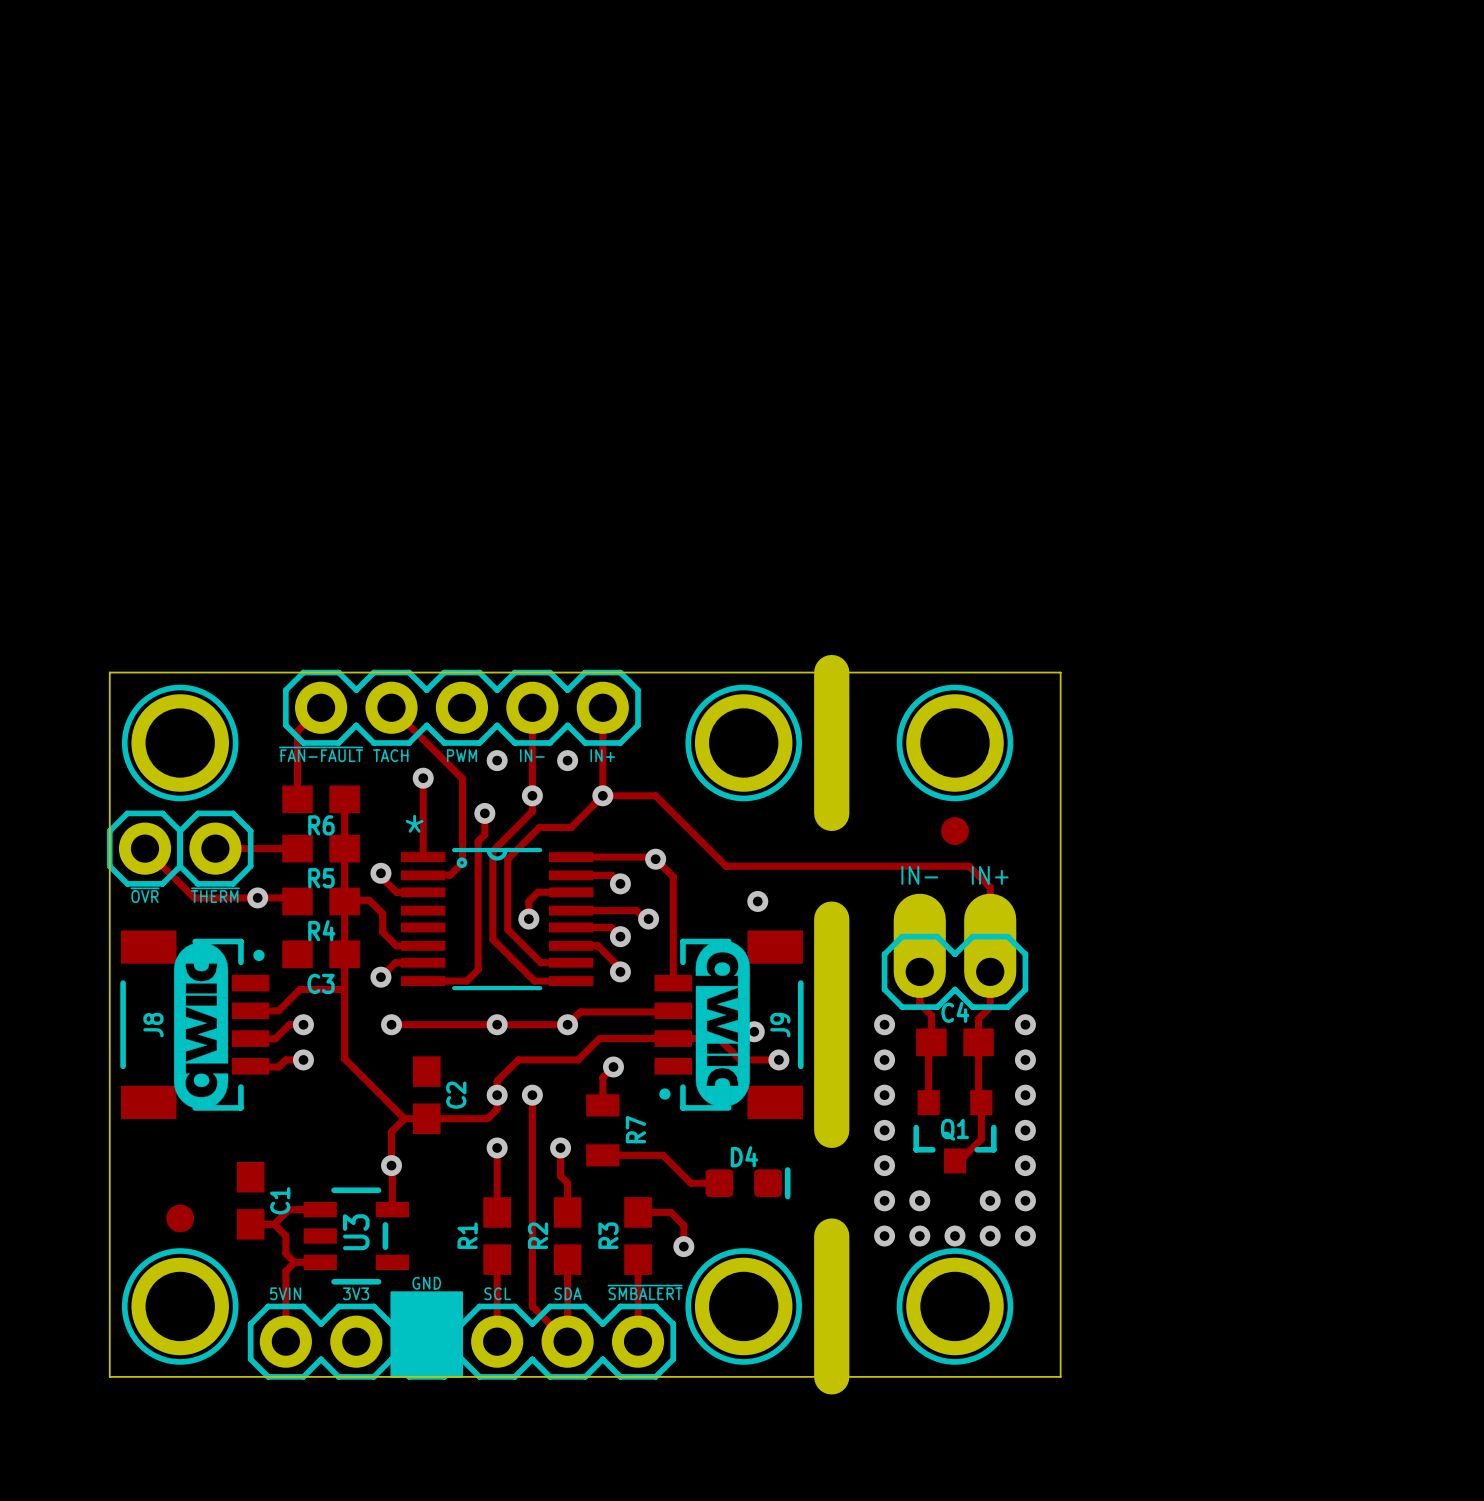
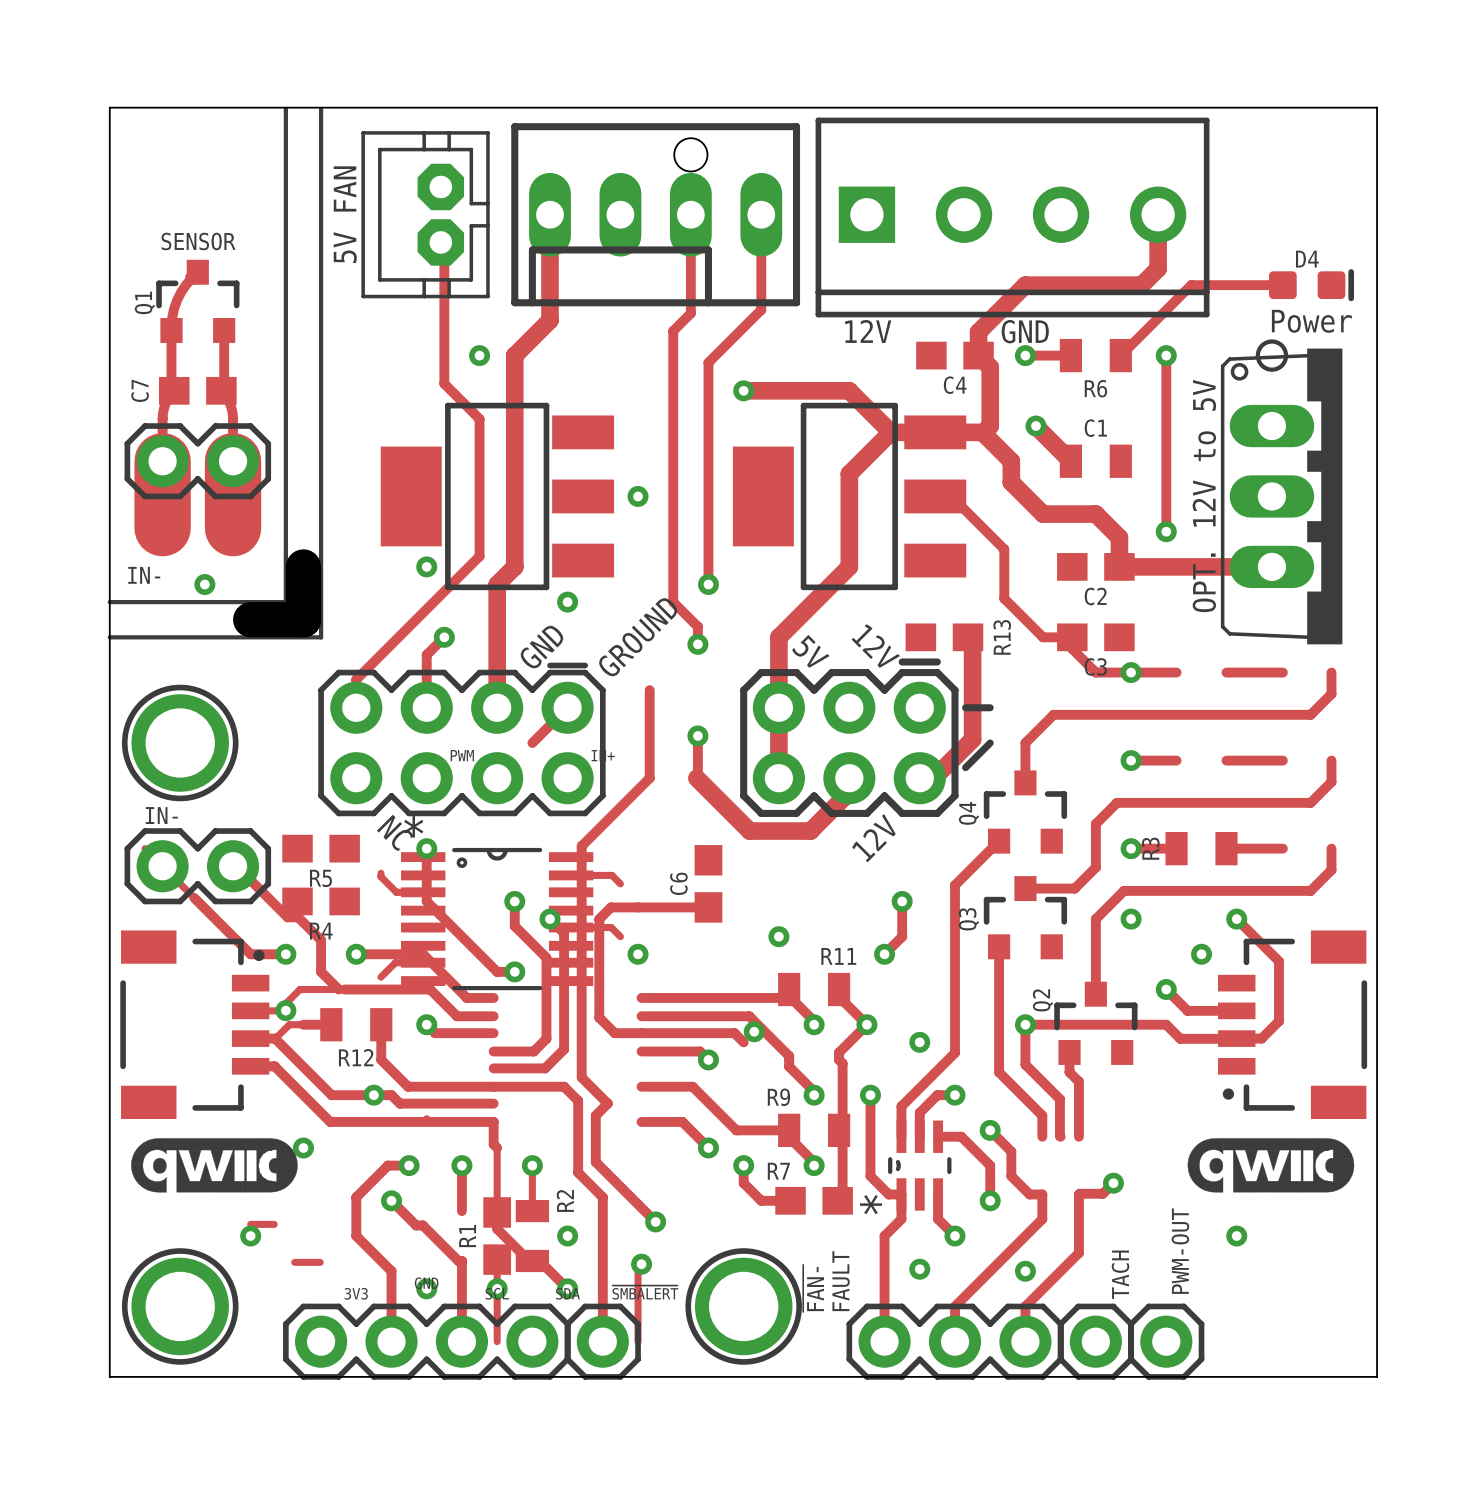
line: none -> (285, 109) (285, 602) (109, 602)
line: none -> (321, 109) (321, 637) (109, 637)
part: none -> (425, 214)
track: none -> (549, 214) (549, 320) (514, 355) (514, 566) (497, 584) (497, 707)
part: none -> (655, 214)
track: none -> (690, 214) (690, 313) (673, 330) (673, 602) (697, 626) (697, 644)
track: none -> (761, 214) (761, 309) (708, 362) (708, 584)
track: none -> (1158, 214) (1158, 268) (1141, 285) (1025, 285) (978, 332) (978, 355) (990, 367) (990, 426) (983, 433)
text: none -> 5V FAN (345, 214)
part: none -> (1012, 217)
text: none -> SENSOR (198, 241)
track: none -> (440, 242) (444, 245) (444, 383) (479, 418) (479, 556) (356, 679) (356, 707)
track: none -> (197, 272) (180, 292) (172, 318) (171, 384) (174, 390) (167, 399) (162, 413) (162, 528)
track: none -> (1282, 285) (1191, 285) (1120, 355)
text: none -> Power (1311, 321)
track: none -> (224, 330) (224, 384) (221, 390) (227, 399) (232, 413) (233, 528)
text: none -> 12V (868, 331)
text: none -> GND (1025, 331)
drawing: none -> [1255, 339, 1289, 372]
via: none -> (479, 355)
track: none -> (1025, 355) (1070, 355)
via: none -> (1025, 355)
track: none -> (1166, 355) (1166, 531)
via: none -> (1166, 355)
C7: none -> (197, 390)
track: none -> (743, 390) (849, 390) (890, 432)
via: none -> (743, 390)
track: none -> (1035, 426) (1070, 461)
via: none -> (1035, 426)
track: none -> (890, 432) (982, 432) (1011, 461) (1011, 482) (1043, 514) (1095, 514) (1119, 537) (1119, 566) (1271, 566)
track: none -> (890, 432) (849, 473) (849, 566) (778, 637) (778, 778)
part: none -> (197, 461)
text: none -> OPT. 12V to 5V (1204, 496)
part: none -> (497, 496)
via: none -> (638, 496)
part: none -> (849, 496)
track: none -> (935, 496) (951, 496) (1004, 549) (1004, 598) (1043, 637) (1072, 637) (1072, 648) (1095, 672) (1176, 672)
part: none -> (1281, 496)
via: none -> (1166, 531)
board edge: none -> (303, 566) (303, 619) (250, 619)
via: none -> (426, 566)
text: none -> IN- (144, 575)
via: none -> (204, 584)
via: none -> (708, 584)
via: none -> (567, 602)
text: none -> GROUND (638, 637)
track: none -> (444, 637) (426, 654) (426, 707)
via: none -> (444, 637)
R13: none -> (944, 637)
track: none -> (968, 637) (972, 641) (972, 739) (933, 778) (919, 778)
text: none -> GND (541, 647)
via: none -> (697, 644)
text: none -> 12V (875, 646)
text: none -> 5V (810, 651)
line: none -> (902, 661) (937, 661)
board edge: (109, 672) (1060, 672) (1060, 1376) -> (109, 672) (109, 107) (1377, 107) (1377, 1376) (1060, 1376)
line: none -> (761, 672) (743, 690) (743, 795) (761, 813) (796, 813) (814, 795) (831, 813) (866, 813) (884, 795) (902, 813) (937, 813) (954, 795) (954, 690) (937, 672) (902, 672) (884, 690) (866, 672) (831, 672) (814, 690) (796, 672) (761, 672)
board edge: (831, 672) (831, 813) -> none
via: none -> (1131, 672)
track: none -> (1226, 672) (1282, 672)
track: none -> (1331, 672) (1331, 694) (1310, 714) (1053, 714) (1025, 742) (1025, 782)
track: none -> (649, 690) (649, 778) (581, 846) (581, 1077) (607, 1103) (595, 1115) (595, 1162) (655, 1221)
track: (321, 707) (297, 731) (297, 799) -> none
track: (391, 707) (462, 778) (462, 862) (450, 875) (423, 875) -> none
part: (461, 707) -> none
track: (532, 707) (532, 811) (492, 851) (492, 939) (534, 981) (571, 981) -> none
track: none -> (567, 707) (532, 742)
track: (602, 707) (602, 795) -> none
line: none -> (965, 707) (990, 707)
track: none -> (697, 735) (696, 778) (749, 831) (810, 831) (849, 792) (849, 778)
via: none -> (697, 735)
part: none -> (461, 739)
part: (743, 742) -> none
part: none -> (849, 742)
part: (954, 742) -> none
line: none -> (990, 742) (965, 767)
text: ~{FAN-FAULT} (321, 754) -> none
text: TACH (390, 755) -> none
text: IN- (532, 755) -> none
via: (497, 760) -> none
via: (567, 760) -> none
track: none -> (1131, 760) (1176, 760)
via: none -> (1131, 760)
track: none -> (1226, 760) (1282, 760)
track: none -> (1331, 760) (1331, 782) (1310, 802) (1116, 802) (1095, 823) (1095, 867) (1074, 888) (1025, 888)
track: (423, 778) (423, 857) -> none
via: (423, 778) -> none
R6 footprint: [282, 785, 360, 814] -> [1059, 338, 1132, 373]
via: (532, 795) -> none
track: (602, 795) (655, 795) (726, 866) (969, 866) (990, 887) (990, 1007) (978, 1018) (978, 1099) (981, 1102) (981, 1139) (959, 1160) (954, 1160) -> none
track: (602, 795) (571, 827) (539, 827) (507, 859) (507, 929) (540, 962) (571, 962) -> none
via: (602, 795) -> none
track: (344, 799) (344, 1058) (404, 1118) -> none
part footprint: [177, 810, 254, 887] -> [124, 828, 272, 905]
Q4: none -> (1025, 812)
track: (484, 813) (484, 834) (478, 841) (478, 969) (466, 981) (423, 981) -> none
via: (484, 813) -> none
text: none -> IN- (161, 815)
part: (954, 831) -> none
text: none -> NC (395, 832)
text: none -> 12V (873, 838)
track: none -> (999, 841) (954, 885) (954, 1052) (901, 1106) (901, 1136)
part: (144, 848) -> none
track: (215, 848) (297, 848) -> none
track: none -> (426, 848) (426, 901) (497, 971) (514, 971)
via: none -> (426, 848)
track: none -> (1131, 848) (1176, 848)
via: none -> (1131, 848)
track: none -> (1226, 848) (1282, 848)
track: none -> (1331, 848) (1331, 870) (1310, 890) (1124, 890) (1095, 919) (1095, 994)
track: (571, 857) (653, 857) (673, 876) (673, 983) -> none
via: (655, 859) -> none
track: none -> (233, 866) (236, 866) (287, 917) (298, 917) (321, 940) (321, 971) (338, 989)
via: (380, 873) -> none
text: IN- (919, 875) -> none
text: IN+ (990, 875) -> none
via: (620, 883) -> none
C6: none -> (708, 883)
track: (571, 892) (538, 892) (528, 901) (528, 919) -> none
text: ~{OVR} (144, 895) -> none
text: ~{THERM} (215, 895) -> none
track: (194, 897) (293, 897) (297, 901) -> (194, 897) (250, 954) (285, 954)
via: (257, 897) -> none
track: none -> (514, 901) (514, 926) (546, 957) (546, 1038) (533, 1051) (493, 1051)
via position: (757, 901) -> (778, 936)
track: none -> (902, 901) (902, 936) (884, 954)
via: none -> (902, 901)
track: (345, 902) (345, 900) (369, 900) (382, 913) (382, 932) (396, 945) (423, 945) -> none
track: none -> (708, 907) (610, 907) (599, 919) (599, 1017) (614, 1033) (734, 1033) (743, 1042)
track: (571, 910) (636, 910) (645, 919) (648, 919) -> none
Q3: none -> (1025, 917)
via position: (528, 919) -> (514, 901)
track: none -> (549, 919) (564, 933) (564, 1049) (545, 1068) (493, 1068)
via: none -> (549, 919)
via: (648, 919) -> none
board edge: (831, 919) (831, 1130) -> none
via: none -> (1131, 919)
track: none -> (1236, 919) (1278, 961) (1278, 1021) (1261, 1038) (1236, 1038)
via: none -> (1236, 919)
via: (620, 936) -> none
drawing: [695, 940, 750, 1107] -> none
drawing: [174, 942, 229, 1110] -> none
track: (571, 945) (597, 945) (620, 968) (620, 971) -> none
track: none -> (999, 946) (999, 1072) (1042, 1115) (1042, 1136)
part: (954, 951) -> none
via: none -> (285, 954)
C3 position: (321, 954) -> (1095, 637)
track: none -> (356, 954) (423, 954) (466, 997) (493, 997)
via: none -> (356, 954)
via: none -> (638, 954)
via: none -> (884, 954)
via: none -> (1201, 954)
via: none -> (514, 971)
via: (620, 971) -> none
track: (919, 971) (919, 1003) (931, 1015) (931, 1042) (928, 1045) (928, 1102) -> none
via: (380, 977) -> none
track: none -> (344, 989) (430, 989) (457, 1016) (493, 1016)
R11: none -> (814, 989)
track: none -> (839, 989) (839, 996) (866, 1024) (839, 1052) (839, 1059) (842, 1063) (842, 1126) (839, 1130) (842, 1133) (842, 1195) (837, 1200)
track: none -> (1166, 989) (1187, 1010) (1236, 1010)
via: none -> (1166, 989)
track: none -> (641, 997) (780, 997) (789, 989) (789, 996) (814, 1021) (814, 1024)
track: (673, 1010) (580, 1011) (567, 1024) (391, 1024) -> none
C4 name position: C4 (955, 1012) -> C4 (955, 385)
track: none -> (641, 1016) (749, 1016) (789, 1056) (789, 1066) (814, 1091) (814, 1095)
Q2: none -> (1095, 1023)
track: none -> (303, 1024) (331, 1024)
via position: (303, 1024) -> (285, 1010)
R12: none -> (356, 1024)
track: none -> (381, 1024) (381, 1059) (408, 1086) (564, 1086) (578, 1100) (578, 1172) (602, 1197) (602, 1341)
via: (391, 1024) -> none
track: none -> (426, 1024) (435, 1033) (493, 1033)
via: none -> (426, 1024)
via: (497, 1024) -> none
via: (567, 1024) -> none
J9: (729, 1024) -> none
via: none -> (814, 1024)
via position: (884, 1024) -> (866, 1024)
part: none -> (1292, 1024)
J8 name: J8 (153, 1025) -> none
track: none -> (250, 1038) (275, 1038) (331, 1095) (391, 1095) (399, 1103) (493, 1103)
track: none -> (1236, 1038) (1180, 1038) (1166, 1024) (1025, 1024) (1025, 1064) (1059, 1099) (1060, 1136)
via: none -> (919, 1042)
C4 position: (954, 1042) -> (954, 355)
track: none -> (641, 1051) (700, 1051) (708, 1059)
track: none -> (1069, 1052) (1069, 1072) (1078, 1081) (1078, 1136)
track: (303, 1059) (285, 1059) (278, 1066) (250, 1066) -> (497, 1147) (493, 1144) (493, 1121) (330, 1121) (274, 1066) (250, 1066)
via: (303, 1059) -> none
via: none -> (708, 1059)
track: (778, 1059) (740, 1059) (718, 1038) (599, 1038) (578, 1059) (518, 1059) (497, 1081) (497, 1109) (487, 1118) (404, 1118) -> none
via: (778, 1059) -> none
via: (884, 1059) -> none
via: (1025, 1059) -> none
track: (613, 1066) (602, 1077) (602, 1105) -> none
via: (613, 1066) -> none
track: none -> (641, 1086) (692, 1086) (736, 1130) (789, 1130) (789, 1137) (814, 1162) (814, 1165)
R7 footprint: [586, 1094, 620, 1167] -> [775, 1186, 853, 1215]
via: none -> (373, 1095)
C2 rotation: 0° (426, 1095) -> 90° clockwise (1095, 566)
C2 position: (426, 1095) -> (1095, 566)
via: (497, 1095) -> none
track: (532, 1095) (532, 1165) -> none
via: (532, 1095) -> none
via: none -> (814, 1095)
track: none -> (870, 1095) (870, 1176) (888, 1194) (901, 1194) (901, 1219) (884, 1236) (884, 1341)
via position: (884, 1095) -> (870, 1095)
track: none -> (954, 1095) (937, 1095) (919, 1112) (919, 1136)
via: none -> (954, 1095)
via: (1025, 1095) -> none
track: (404, 1118) (391, 1131) (392, 1209) -> none
track: none -> (641, 1121) (682, 1121) (708, 1147)
R7 name position: R7 (635, 1129) -> R7 (778, 1171)
R9: none -> (814, 1130)
via: (884, 1130) -> none
track: none -> (990, 1130) (1011, 1151) (1011, 1176) (1029, 1194) (1042, 1194) (1042, 1219) (954, 1306) (954, 1341)
via: none -> (990, 1130)
via: (1025, 1130) -> none
Q1 rotation: 0° (954, 1131) -> 180° (197, 301)
Q1 position: (954, 1131) -> (197, 301)
track: none -> (938, 1136) (961, 1136) (990, 1165) (990, 1200)
drawing: none -> [131, 1138, 298, 1193]
drawing: none -> [1187, 1138, 1355, 1193]
via: none -> (303, 1147)
via: (497, 1147) -> none
track: (560, 1147) (560, 1176) (567, 1183) (567, 1212) -> none
via: (560, 1147) -> none
via: none -> (708, 1147)
track: (602, 1155) (662, 1155) (690, 1183) (719, 1183) -> none
C1 footprint: [236, 1161, 265, 1240] -> [1059, 444, 1132, 478]
via position: (391, 1165) -> (409, 1165)
track: none -> (409, 1165) (387, 1165) (356, 1197) (356, 1236) (391, 1271) (391, 1341)
track: none -> (461, 1165) (461, 1211)
via: none -> (461, 1165)
via: none -> (532, 1165)
track: none -> (743, 1165) (743, 1183) (761, 1200) (790, 1200)
via: none -> (743, 1165)
via: none -> (814, 1165)
via: (884, 1165) -> none
part: none -> (919, 1165)
via: (1025, 1165) -> none
D4 position: (748, 1183) -> (1311, 285)
track: none -> (1113, 1183) (1102, 1193) (1078, 1194) (1078, 1252) (1025, 1306) (1025, 1341)
via: none -> (1113, 1183)
track: none -> (938, 1194) (938, 1219) (954, 1236)
R2 footprint: [553, 1197, 582, 1275] -> [515, 1199, 550, 1273]
R3 footprint: [624, 1197, 652, 1275] -> [1165, 832, 1238, 866]
track: none -> (391, 1200) (416, 1225) (422, 1225) (458, 1260) (461, 1260) (461, 1341)
via: none -> (391, 1200)
via: (884, 1200) -> none
via: (919, 1200) -> none
via: (1025, 1200) -> none
track: (320, 1209) (288, 1209) (274, 1224) (285, 1236) (285, 1253) (294, 1262) (285, 1271) (285, 1341) -> none
track: (532, 1211) (532, 1306) (567, 1341) (567, 1259) -> none
track: none -> (497, 1212) (497, 1228) (529, 1260) (539, 1260) (567, 1288)
track: (638, 1212) (670, 1212) (683, 1225) (683, 1246) -> none
part: (180, 1218) -> none
via: none -> (655, 1221)
R2 name position: R2 (538, 1235) -> R2 (565, 1200)
via: none -> (250, 1236)
U3: (356, 1236) -> none
via: none -> (567, 1236)
board edge: (831, 1236) (831, 1376) -> none
via: (884, 1236) -> none
via: (919, 1236) -> none
via: (990, 1236) -> none
via: (1025, 1236) -> none
via: none -> (1236, 1236)
text: none -> PWM-OUT (1180, 1251)
via: (683, 1246) -> none
via: none -> (641, 1264)
via: none -> (919, 1269)
via: none -> (1025, 1271)
text: none -> TACH (1120, 1274)
text: none -> FAULT (841, 1281)
text: none -> ~{FAN-} (813, 1288)
via: none -> (426, 1288)
via: none -> (497, 1288)
via: none -> (567, 1288)
drawing: [390, 1291, 464, 1378] -> none
text: 5VIN (285, 1293) -> none
part: (954, 1306) -> none
part: none -> (426, 1341)
part: (461, 1341) -> none
part: none -> (602, 1341)
part: none -> (954, 1341)
part: none -> (1095, 1341)
part: none -> (1166, 1341)

